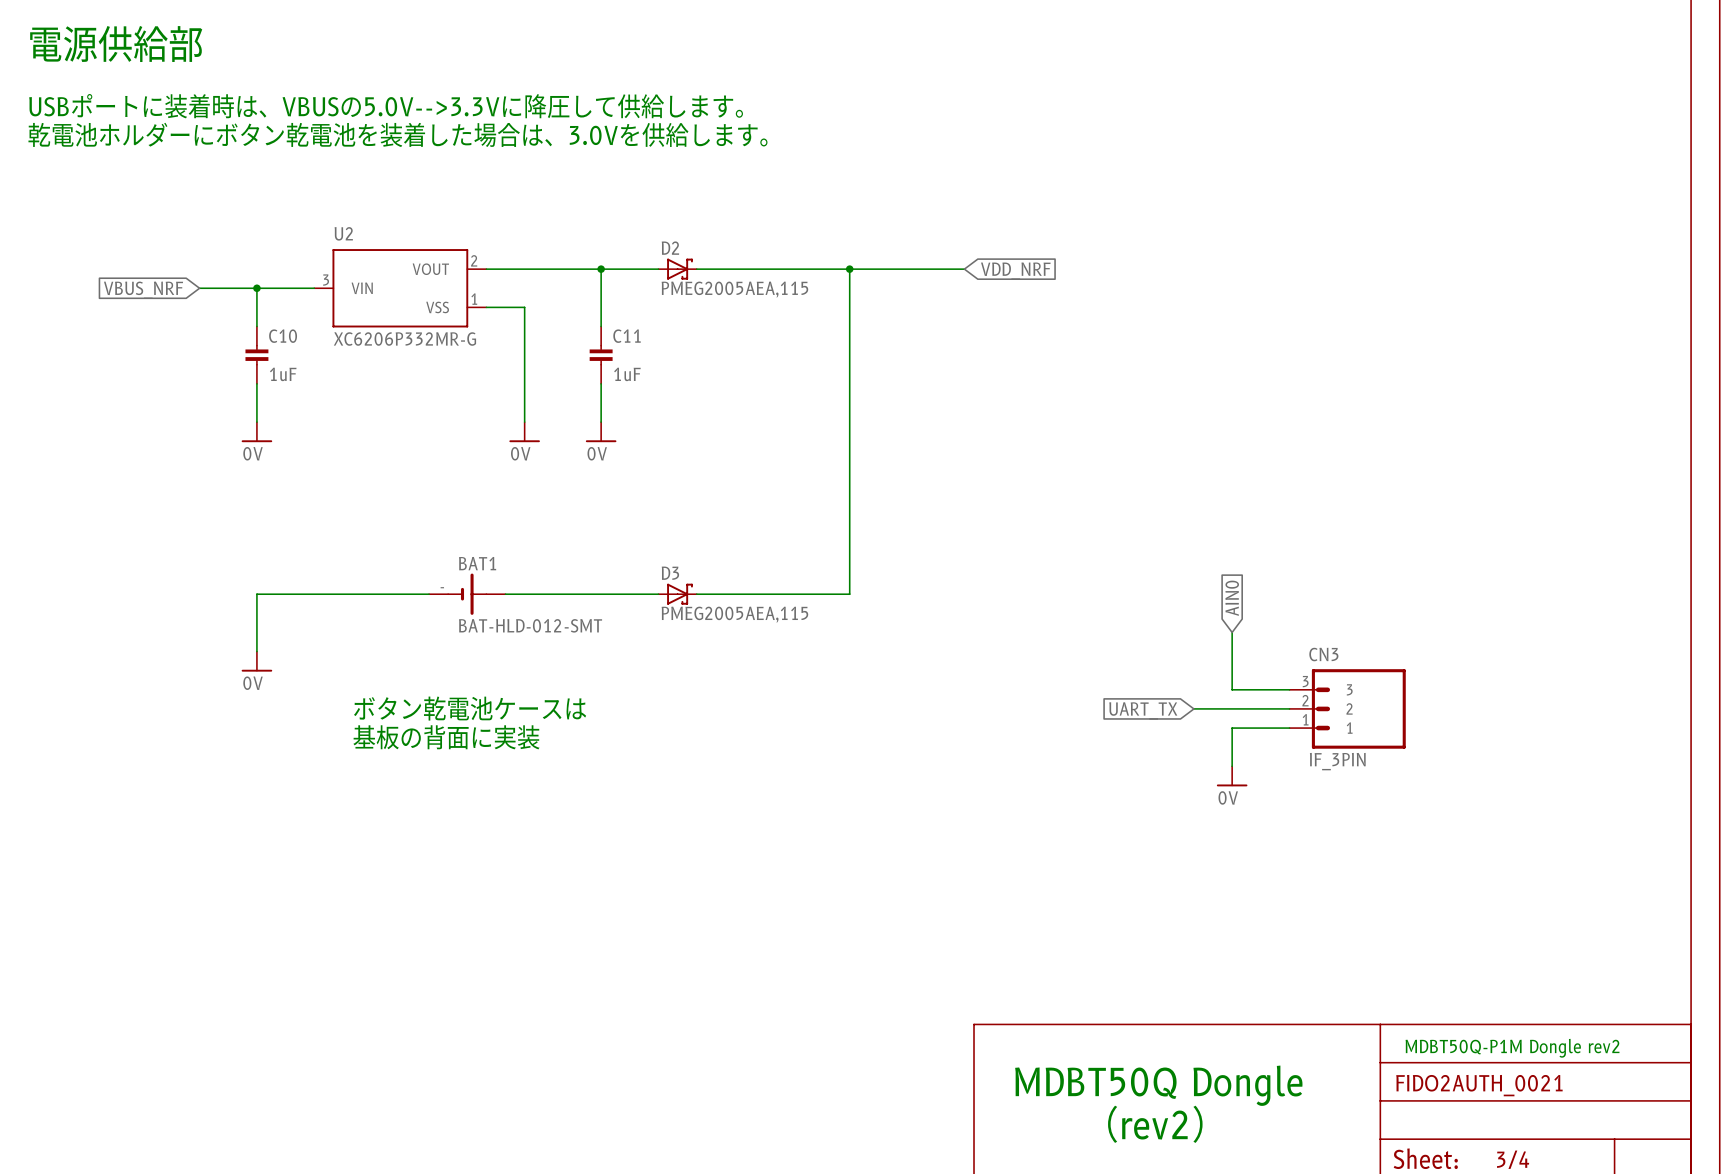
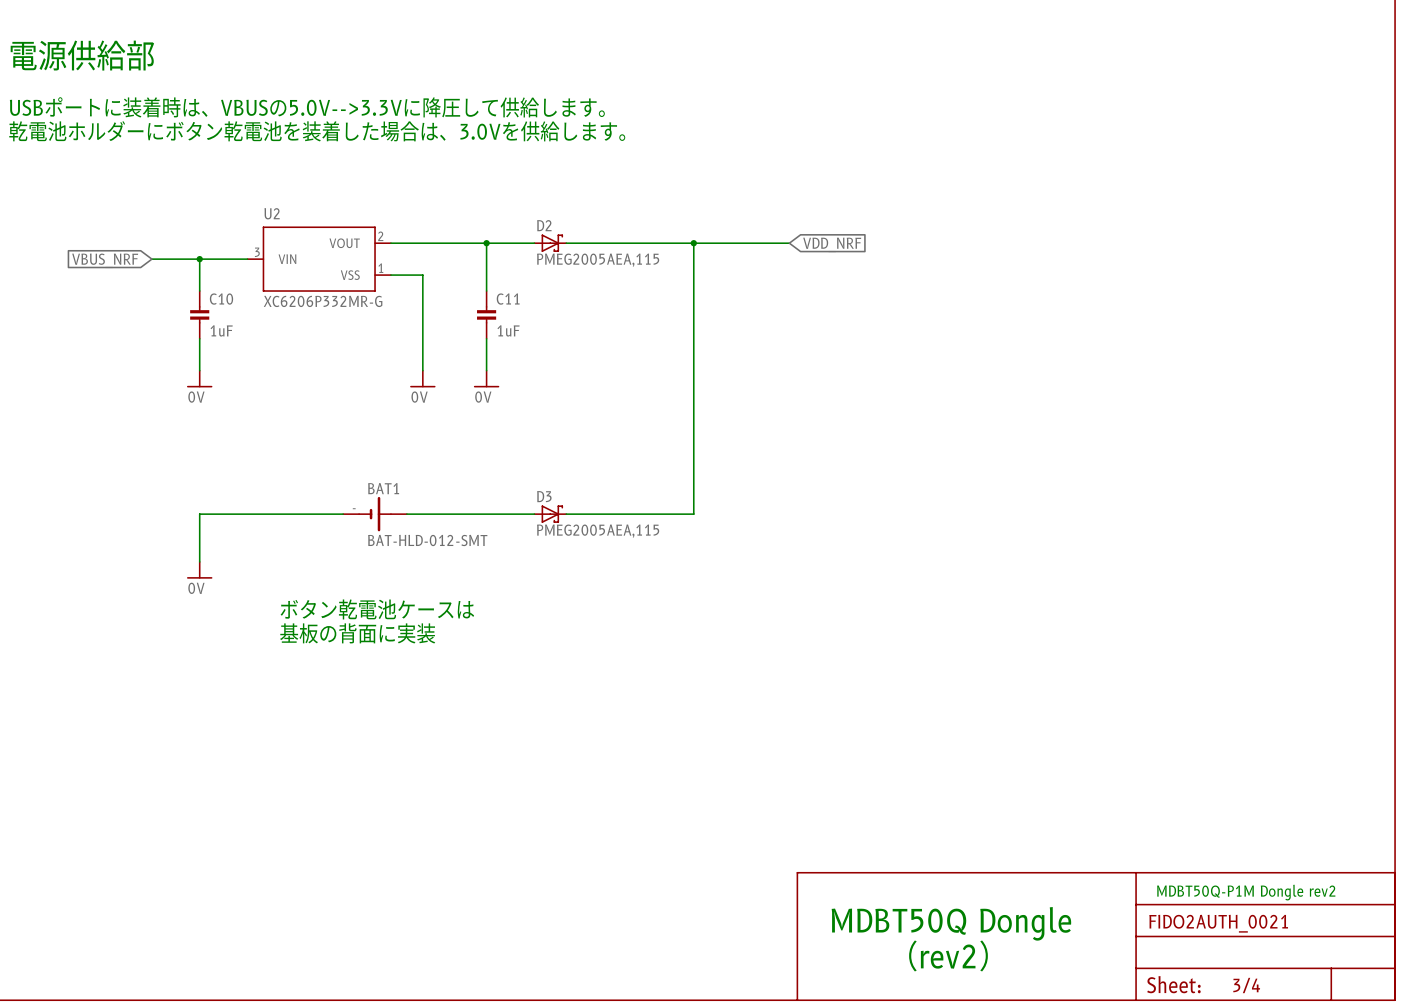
global label: AIN0 (1232, 598) -> none
wire: (1232, 632) (1232, 689) (1289, 689) -> none
wire: (1193, 708) (1289, 708) -> none
CN3: IF_3PIN (1347, 708) -> none
global label: UART_TX (1143, 710) -> none
wire: (1289, 728) (1232, 728) (1232, 766) -> none
power symbol: 0V (1232, 776) -> none

